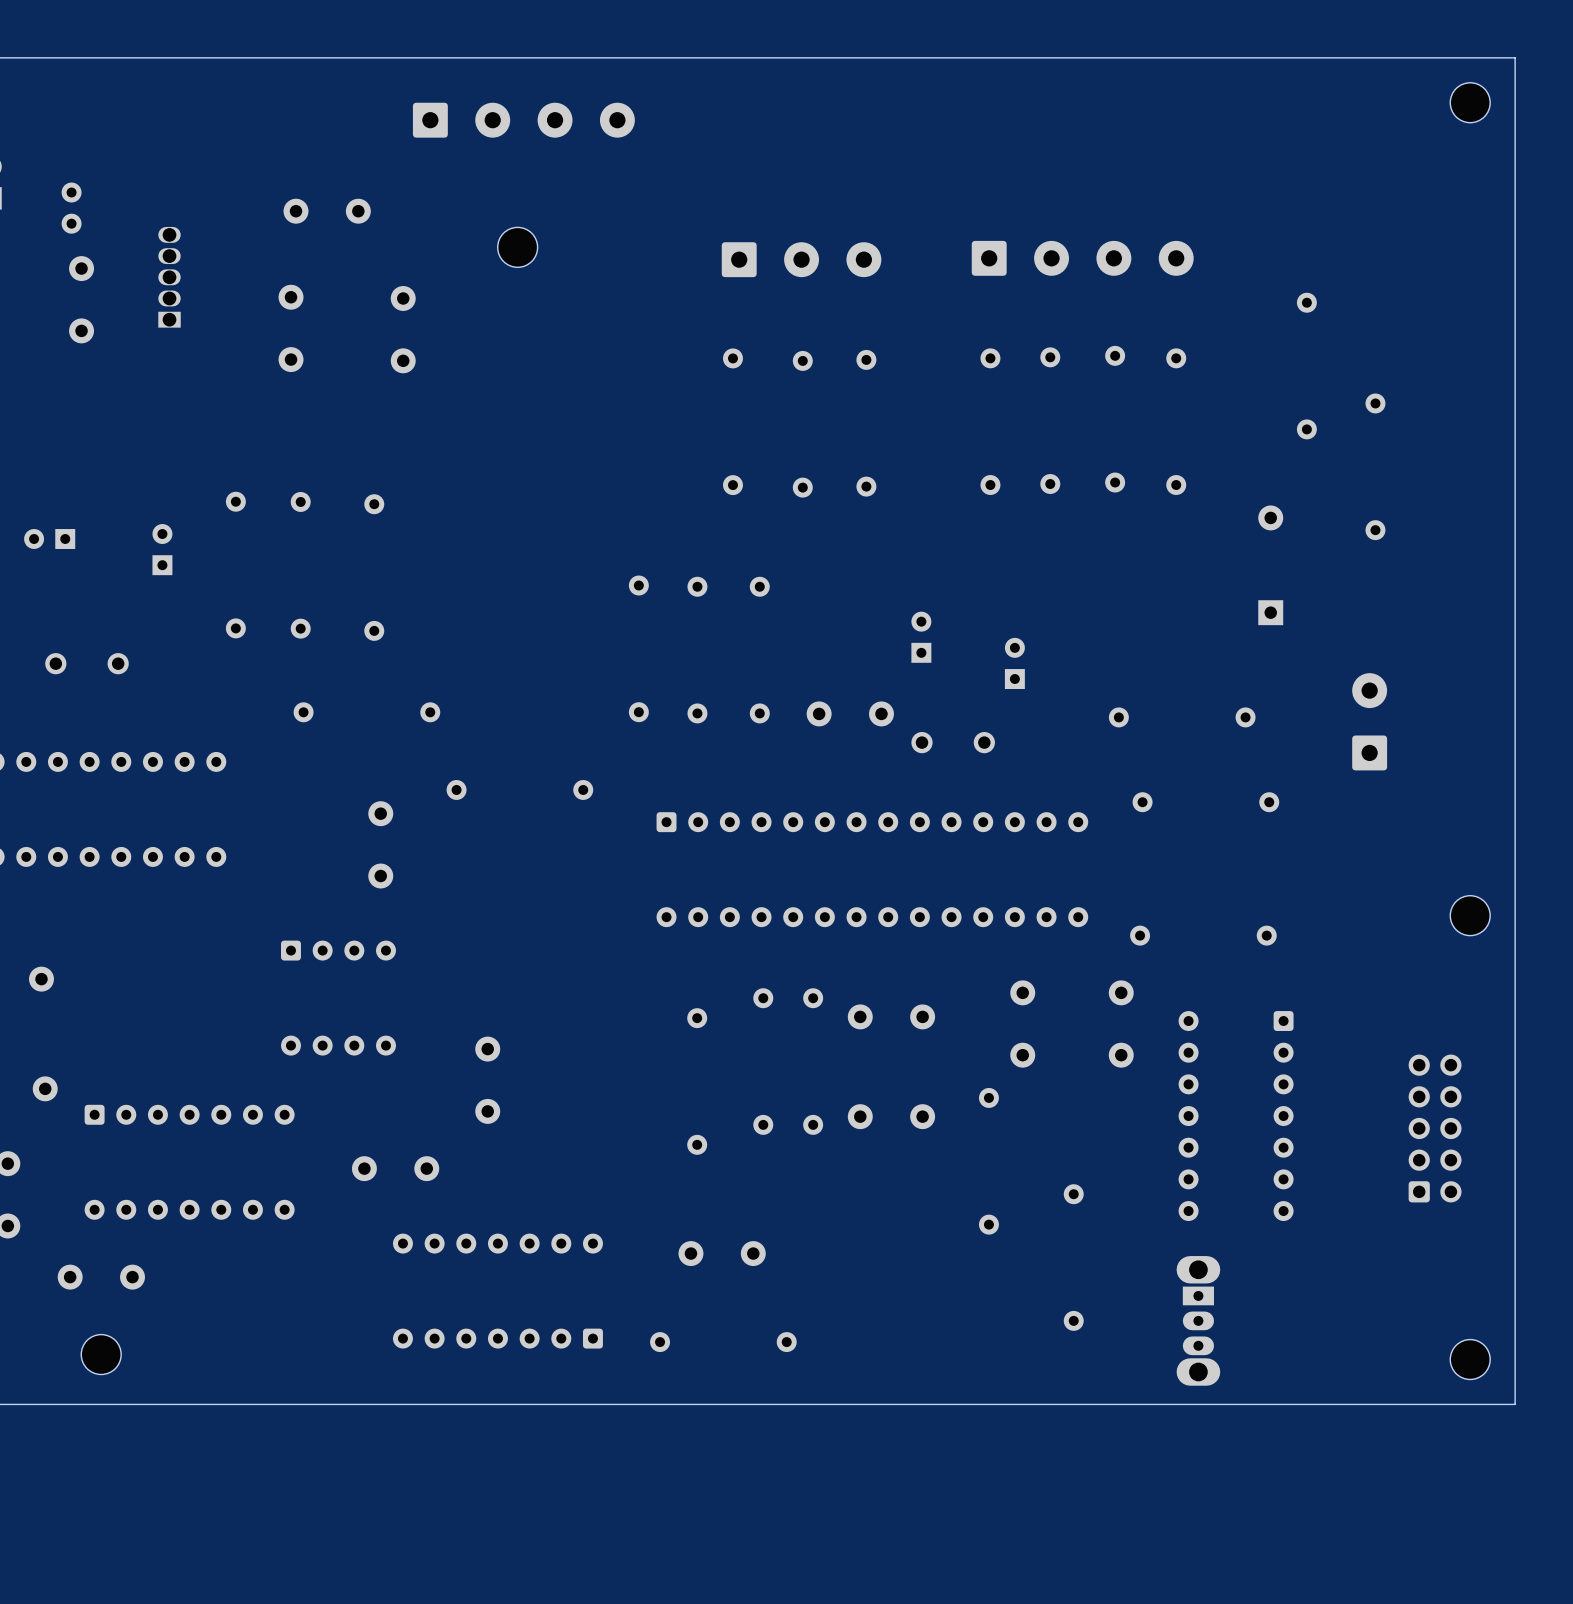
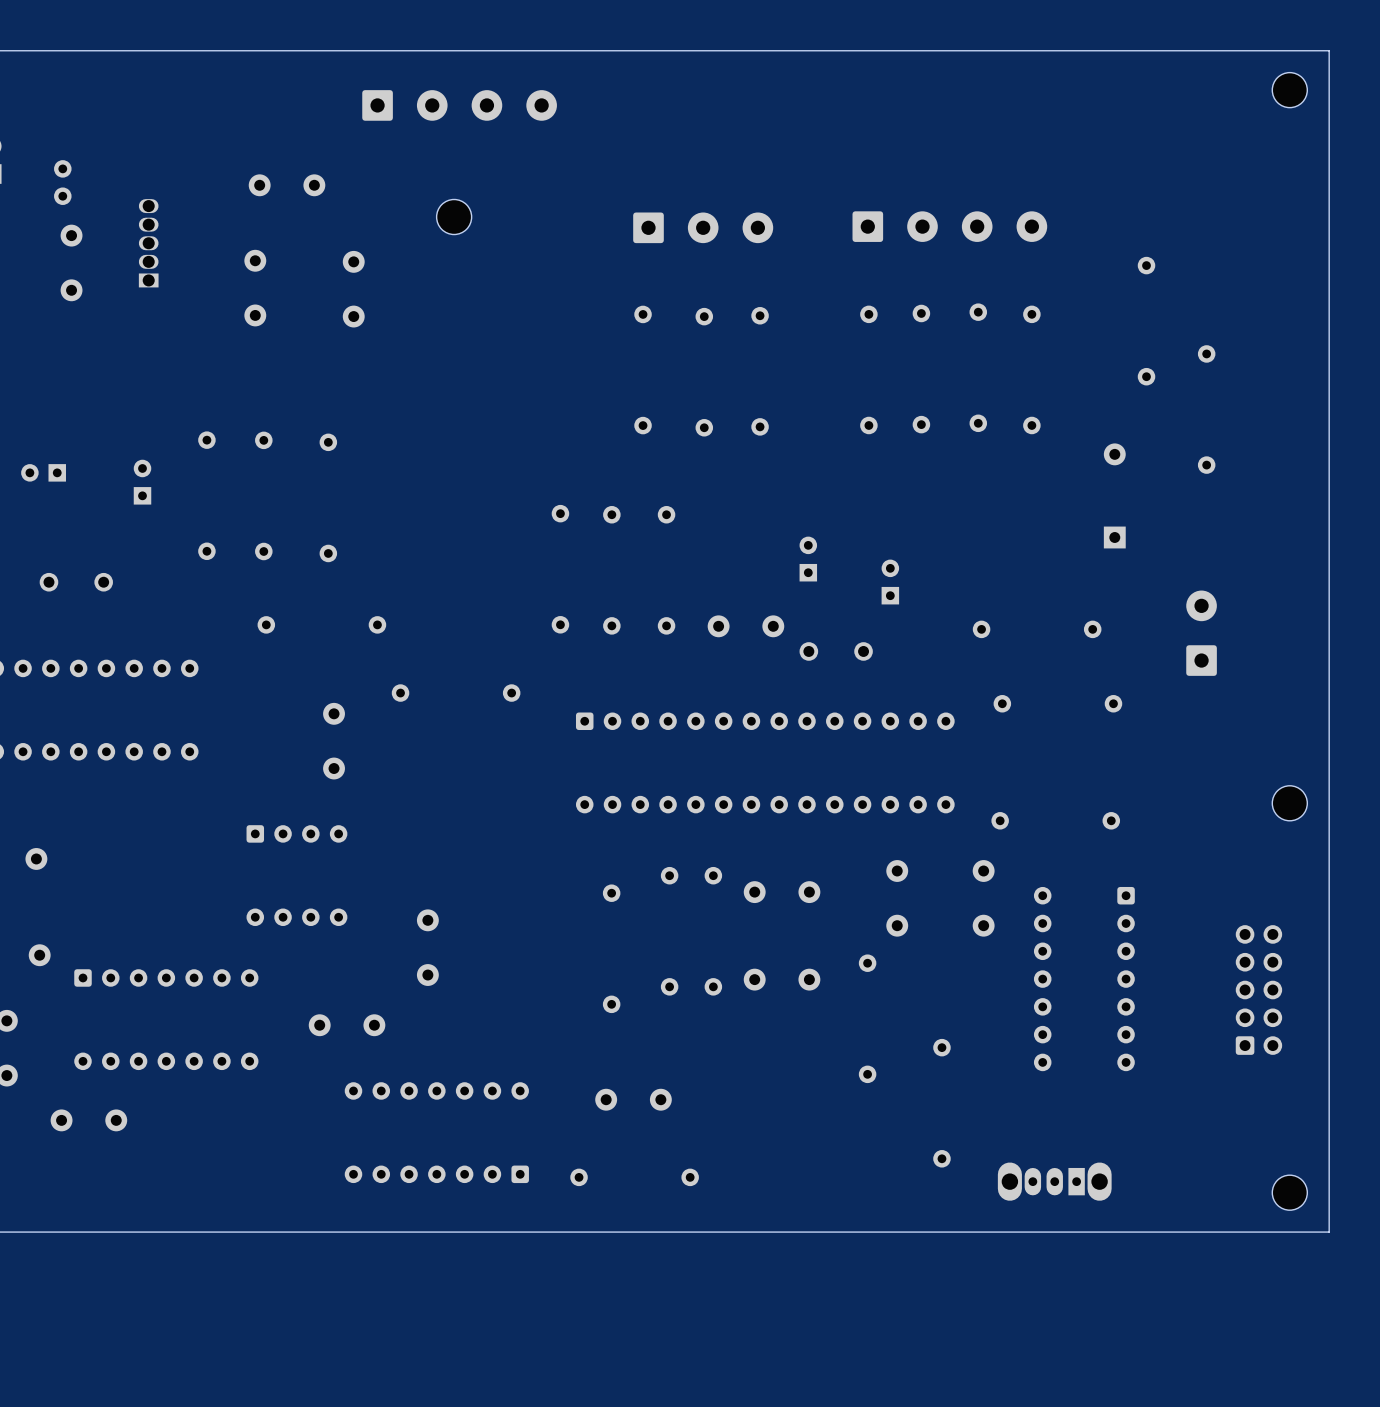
part rotation: 0° (1198, 1320) -> 90° clockwise (1054, 1181)
part: (101, 1354) -> none

